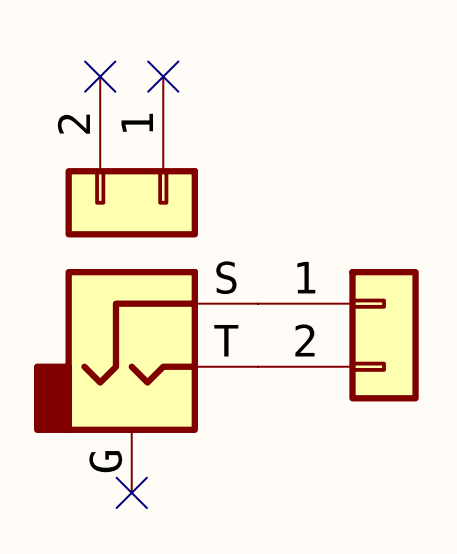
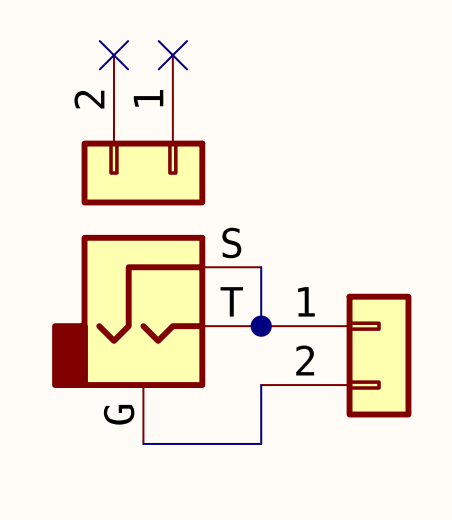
wire: none -> (261, 267) (261, 326)
part position: (338, 335) -> (336, 355)
junction: none -> (261, 326)
wire: none -> (261, 385) (261, 443) (143, 443)
no-connect mark: (131, 492) -> none

